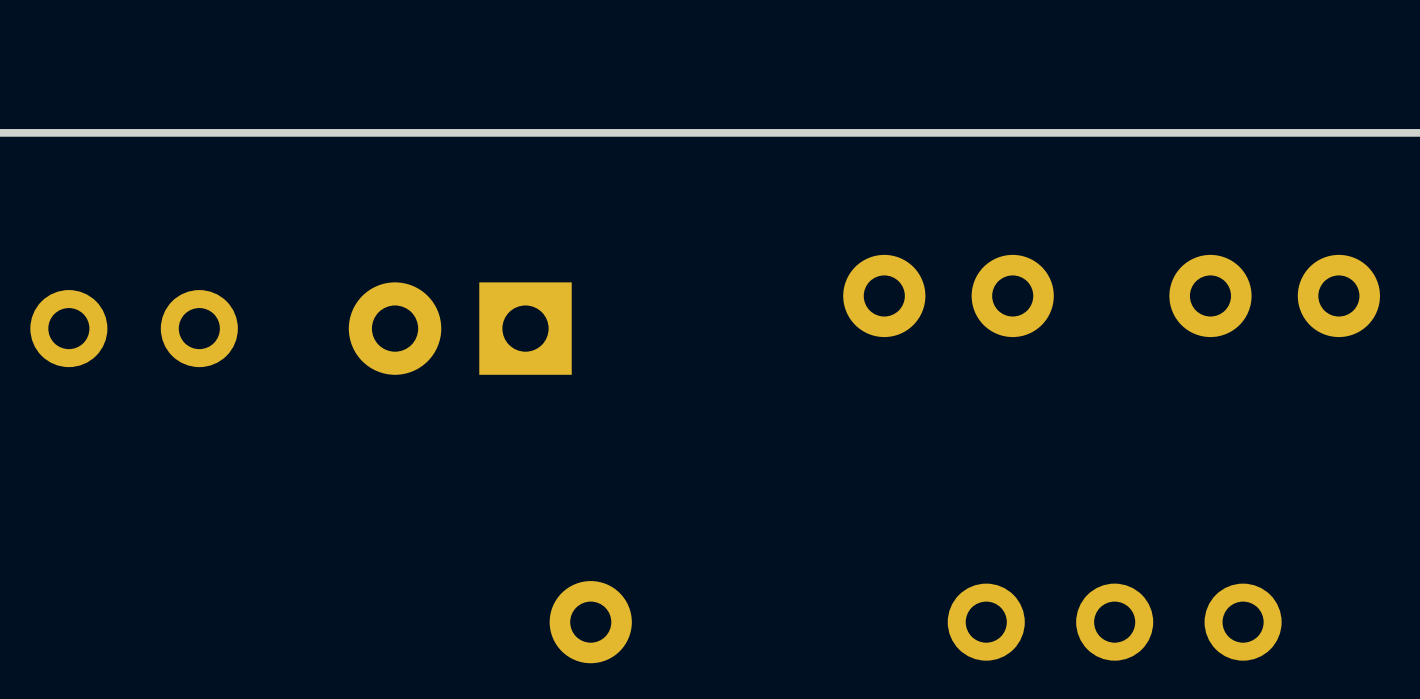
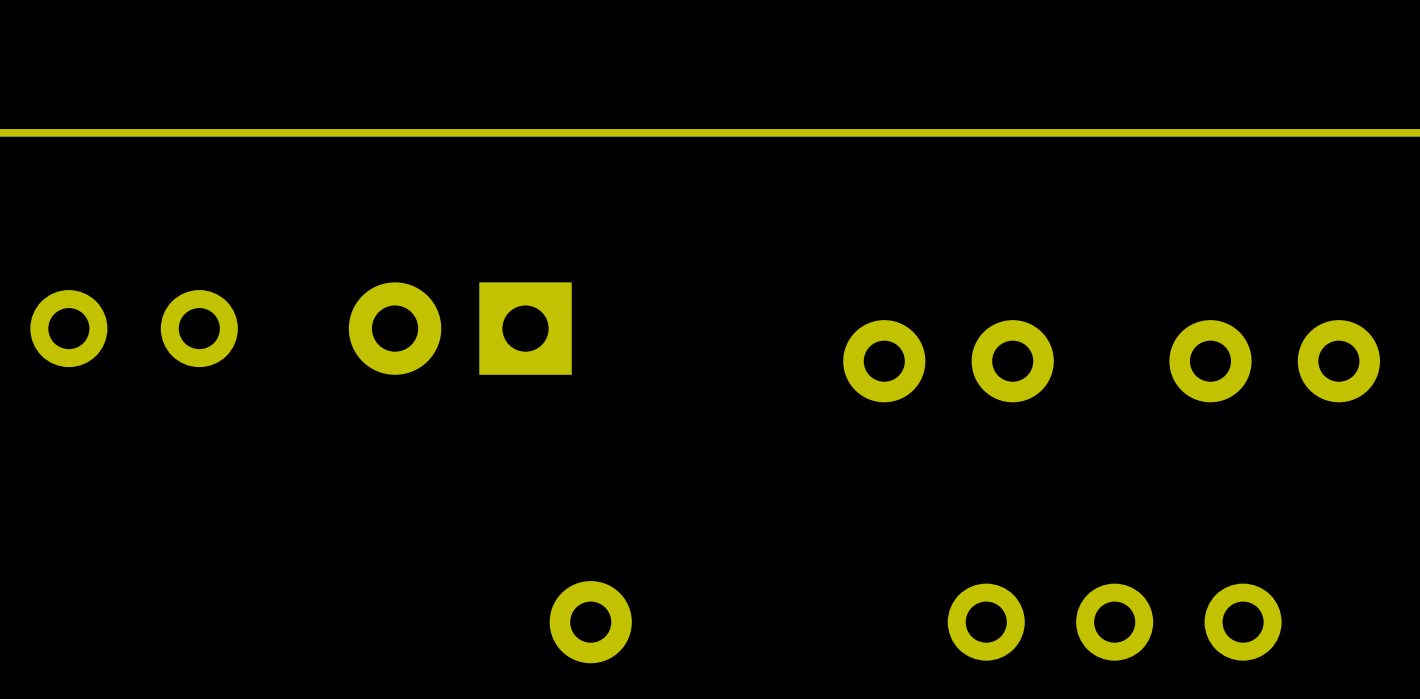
part position: (948, 295) -> (948, 361)
part position: (1274, 295) -> (1274, 361)

